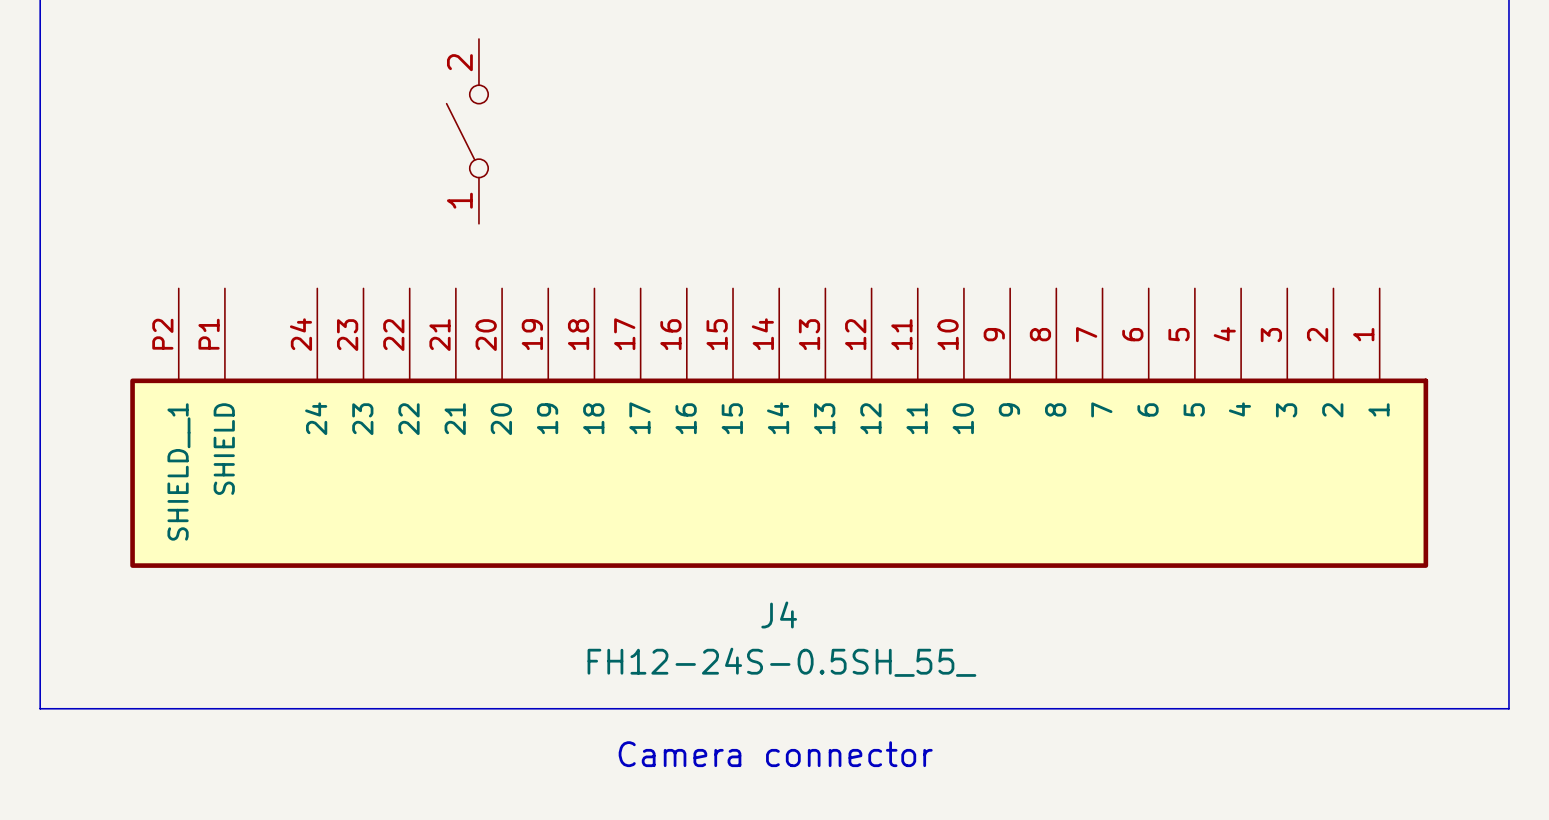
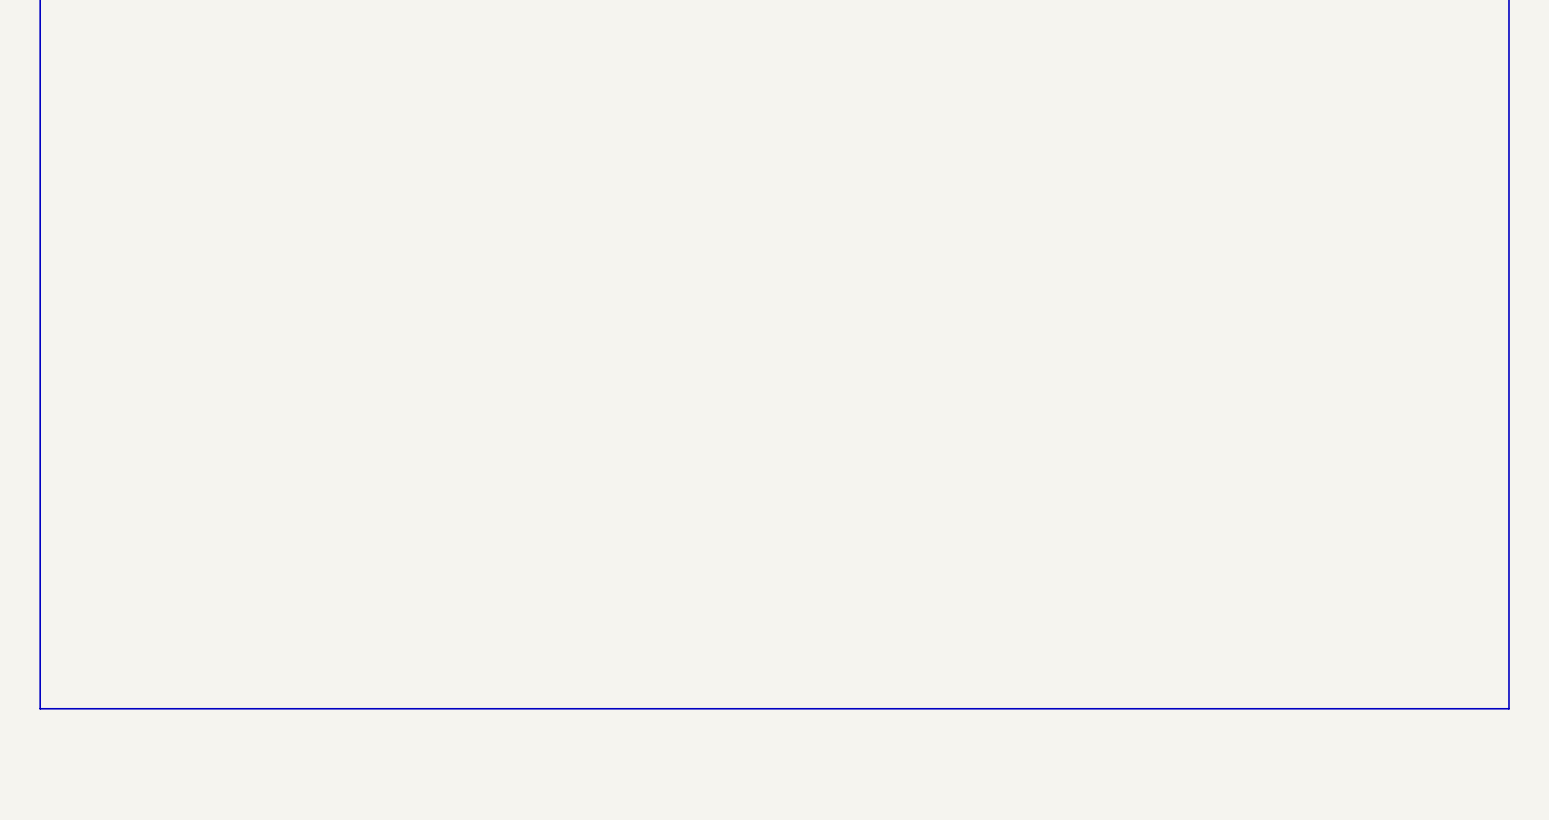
part: (467, 131) -> none
J4: FH12-24S-0.5SH_55_ (779, 428) -> none
text: Camera connector (775, 754) -> none

